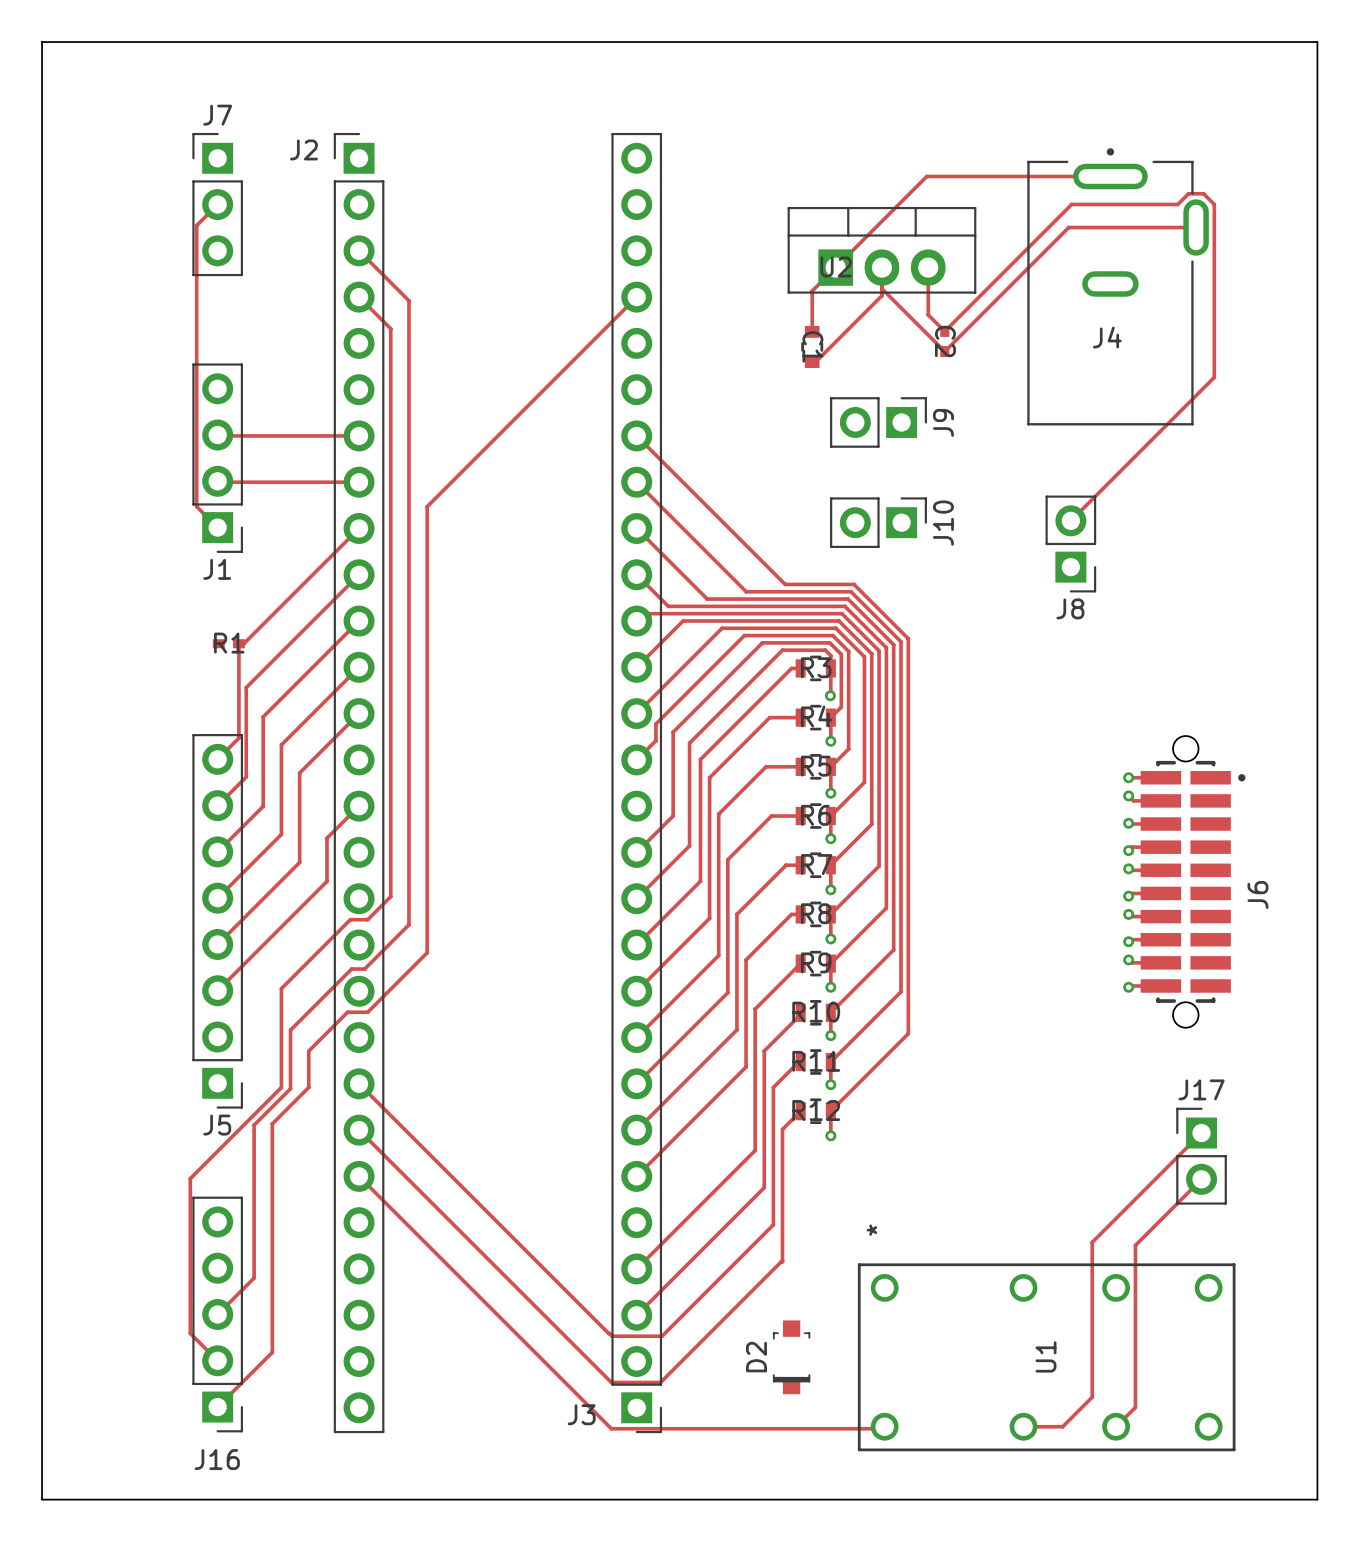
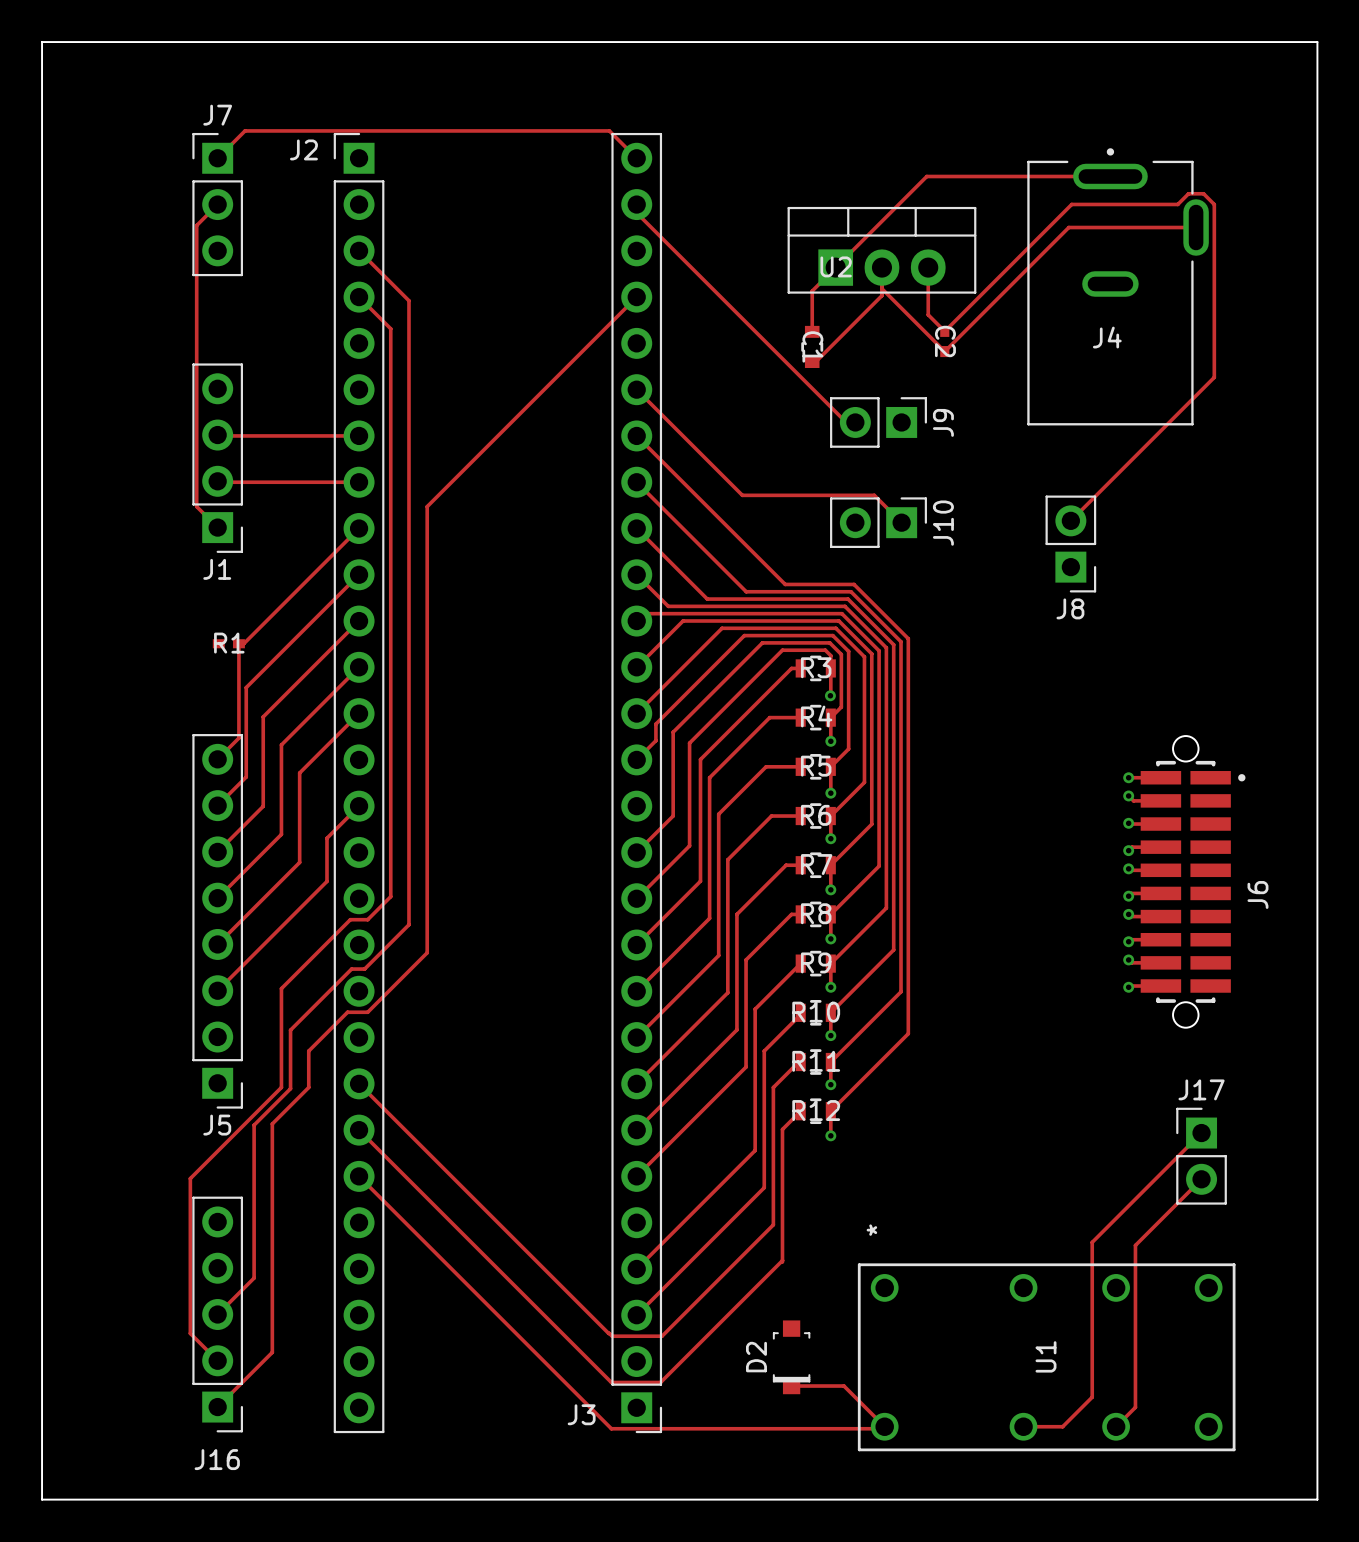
track: none -> (217, 158) (245, 130) (609, 130) (636, 158)
track: none -> (636, 204) (636, 212) (846, 422) (855, 422)
track: none -> (636, 389) (742, 495) (874, 495) (901, 522)
track: none -> (791, 1386) (843, 1386) (884, 1426)

